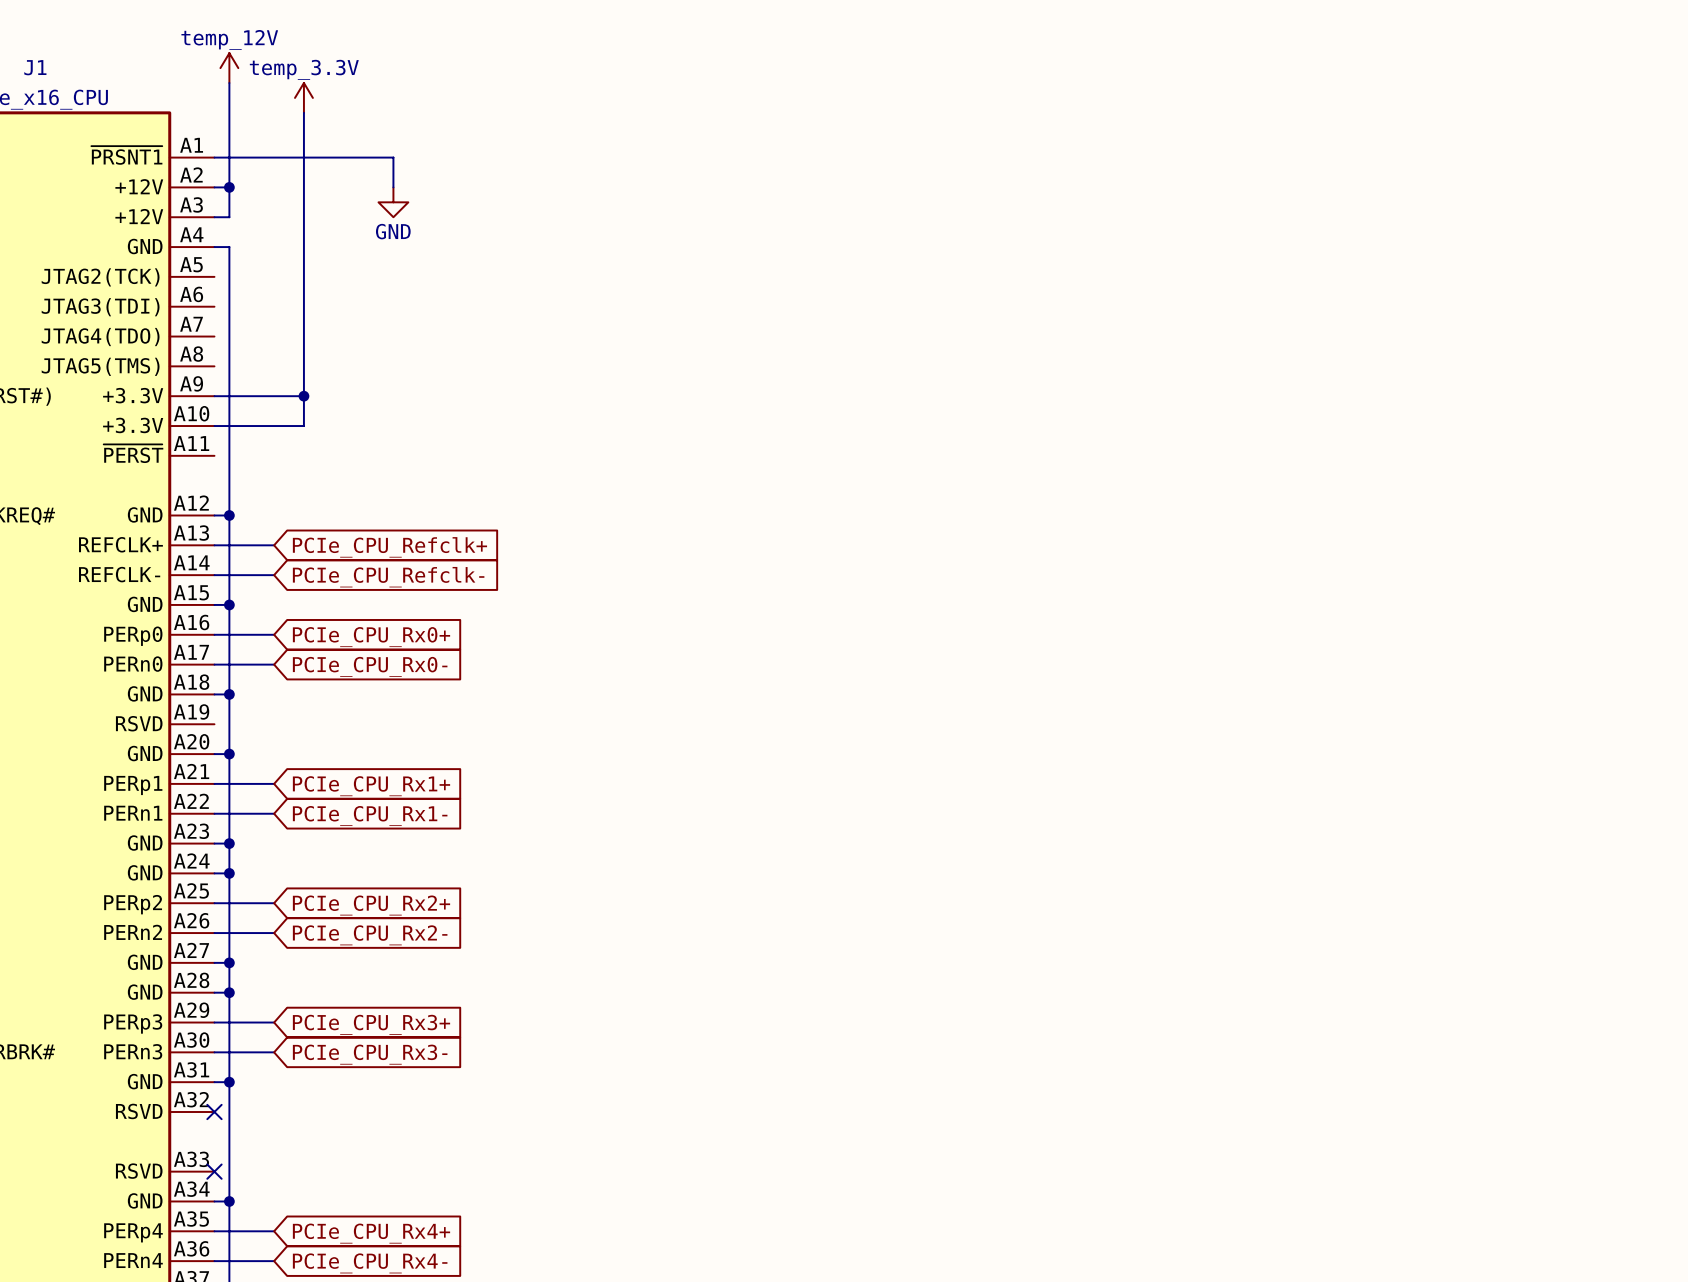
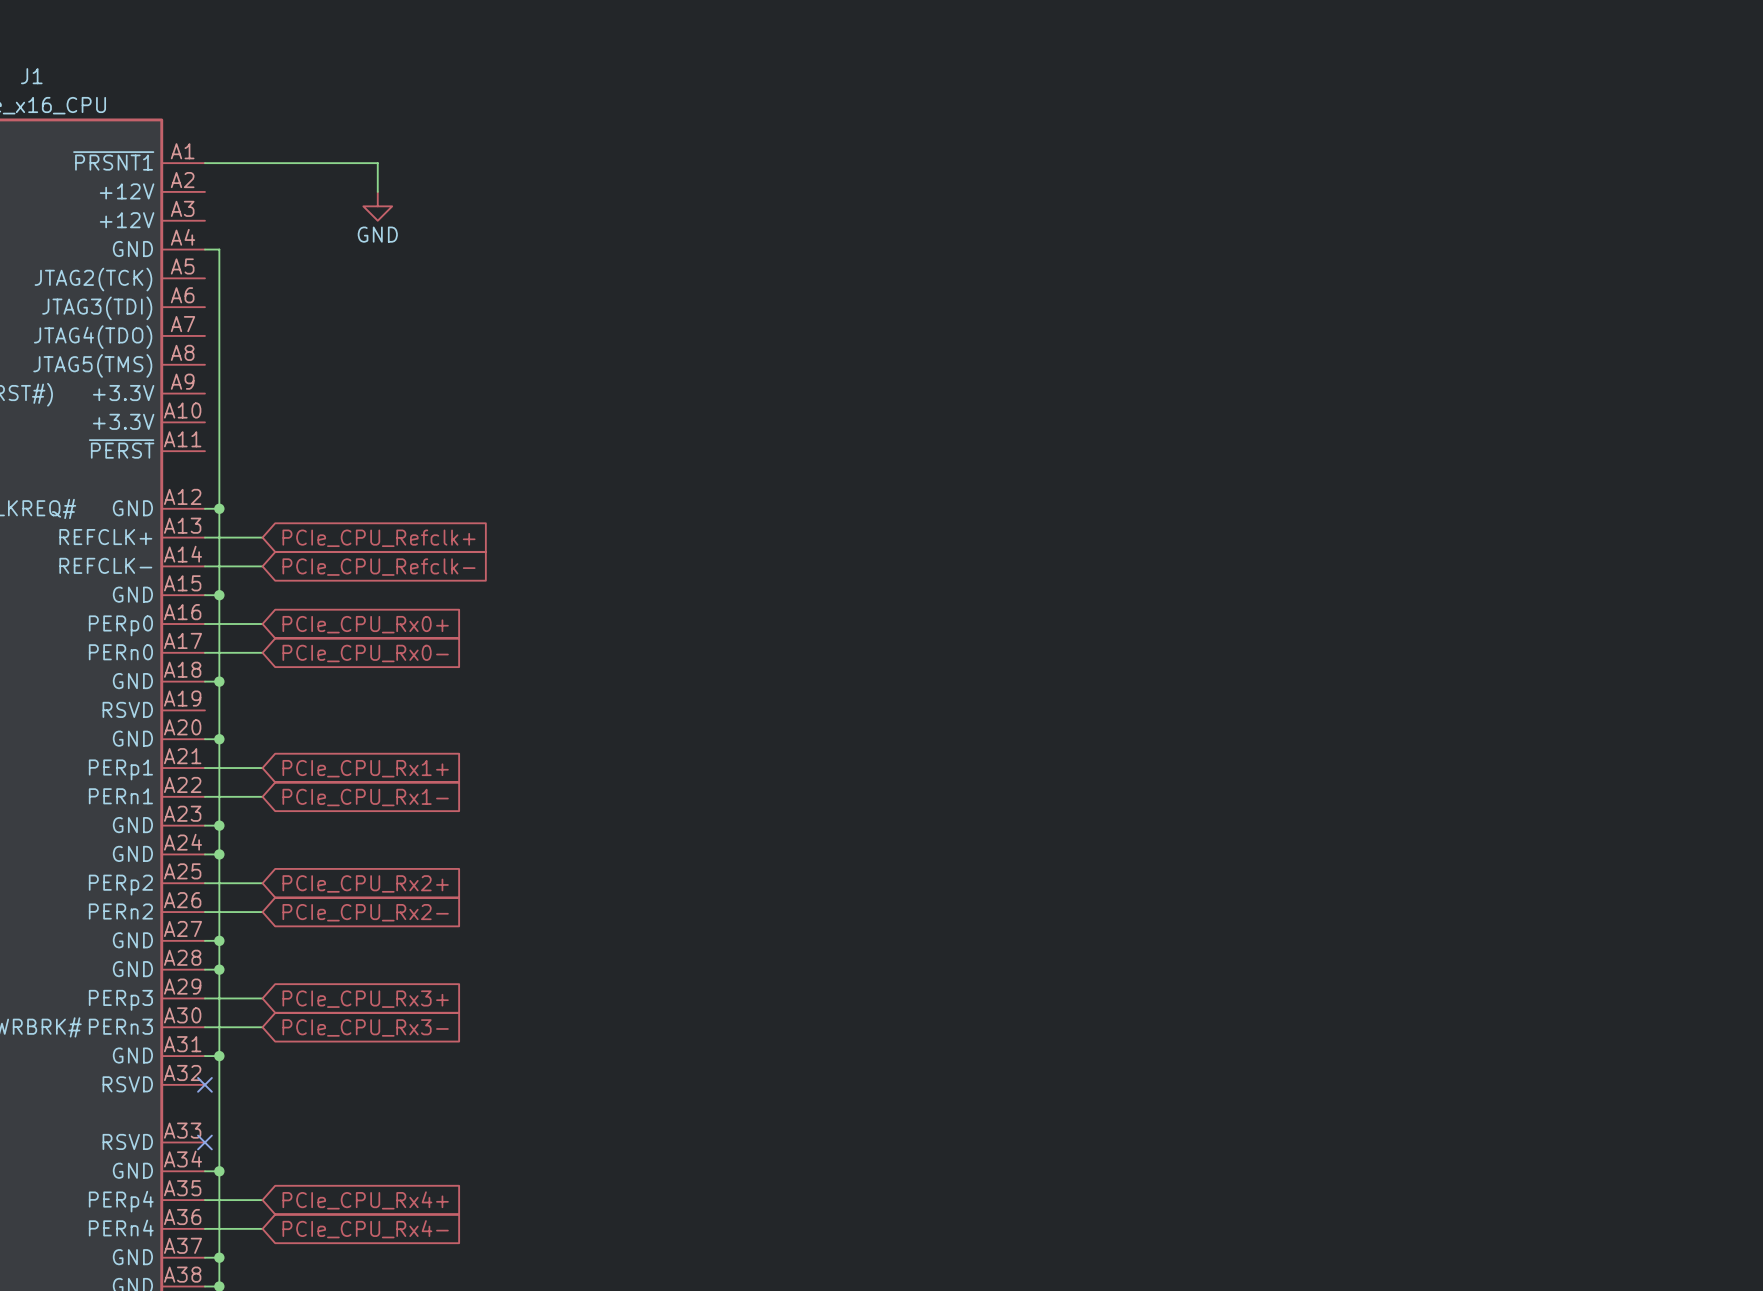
power symbol: temp_12V (229, 68) -> none
wire: (229, 83) (229, 217) (214, 217) -> none
power symbol: temp_3.3V (303, 97) -> none
wire: (303, 112) (303, 426) (214, 426) -> none
wire: (214, 187) (229, 187) -> none
junction: (229, 187) -> none
wire: (214, 396) (303, 396) -> none
junction: (303, 396) -> none

